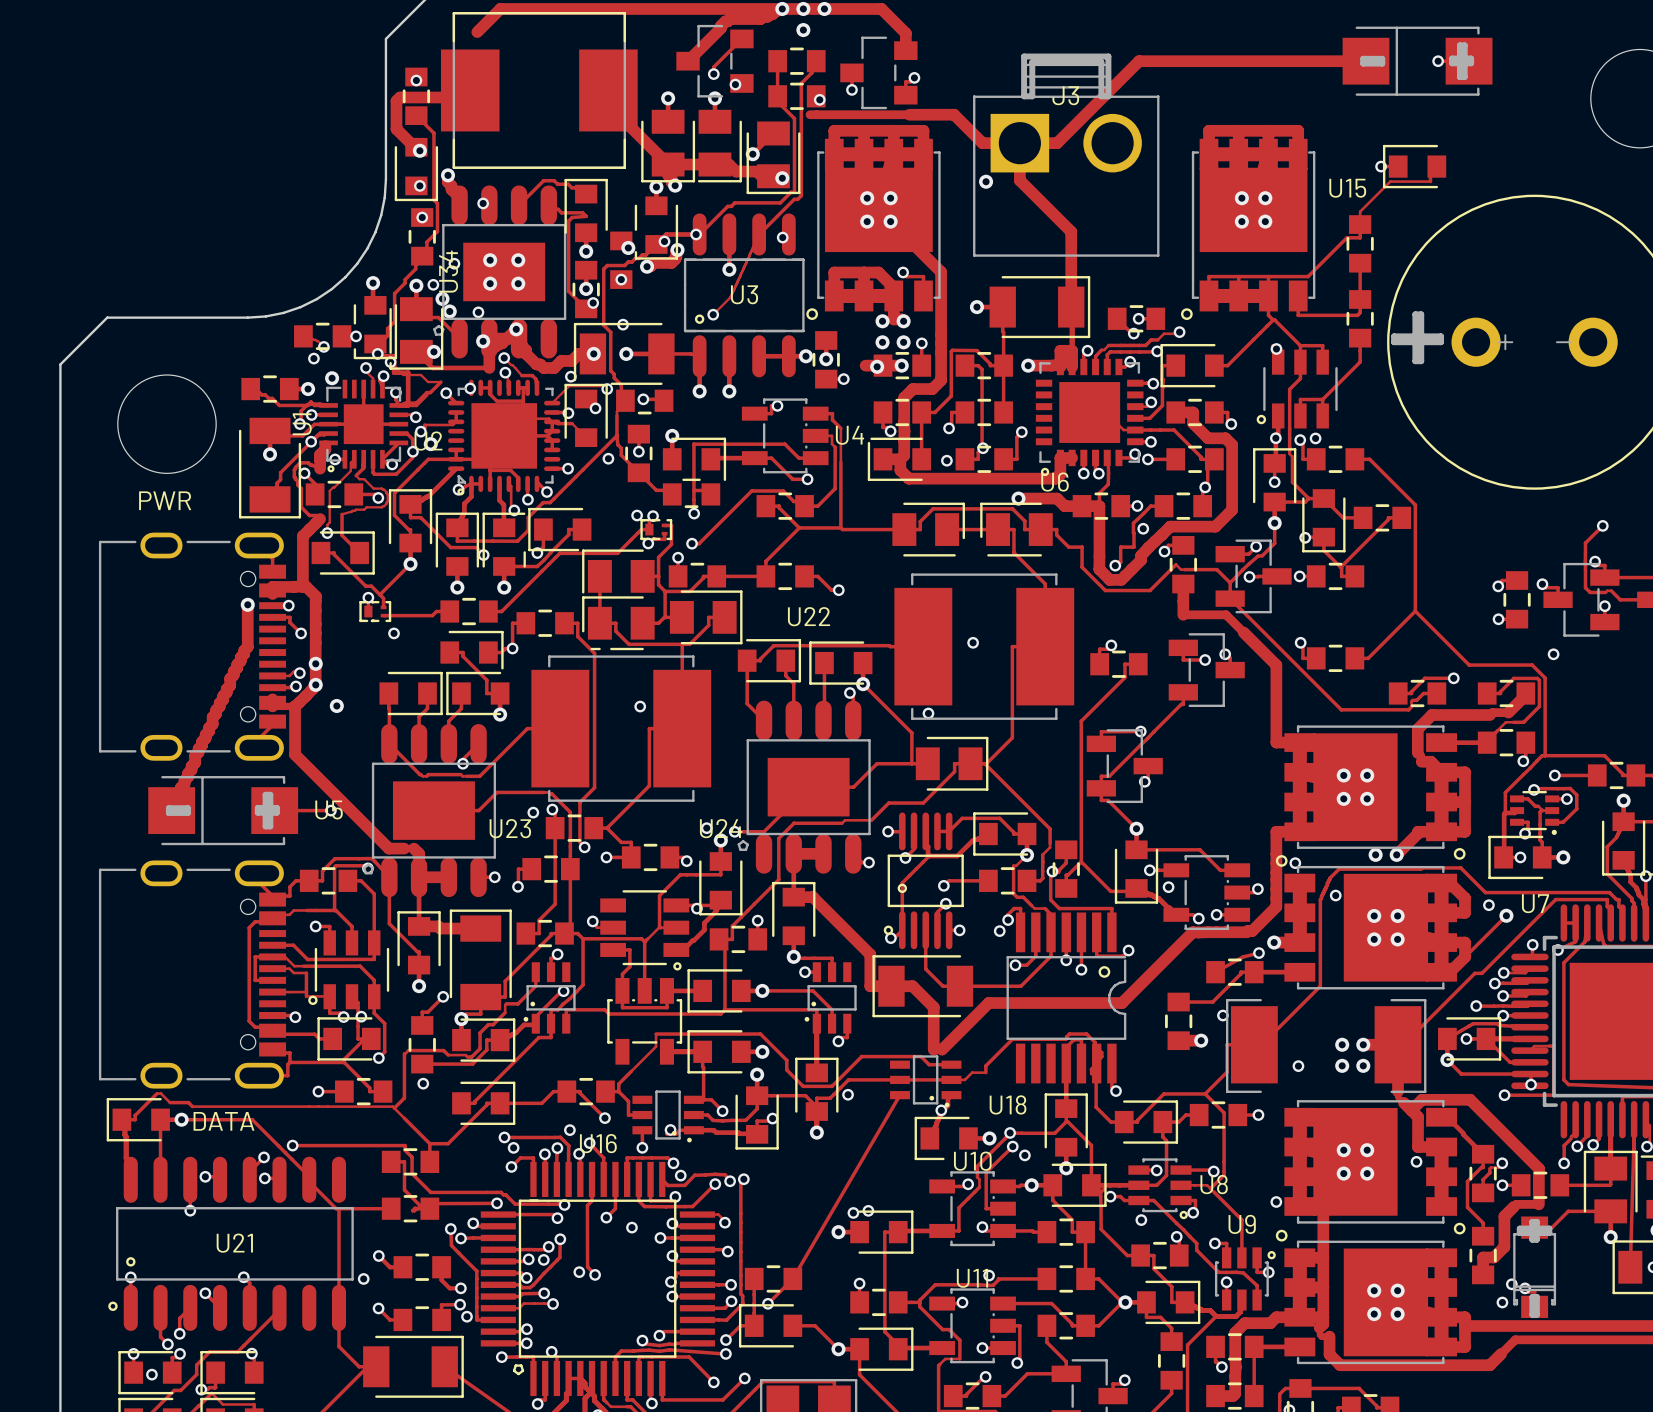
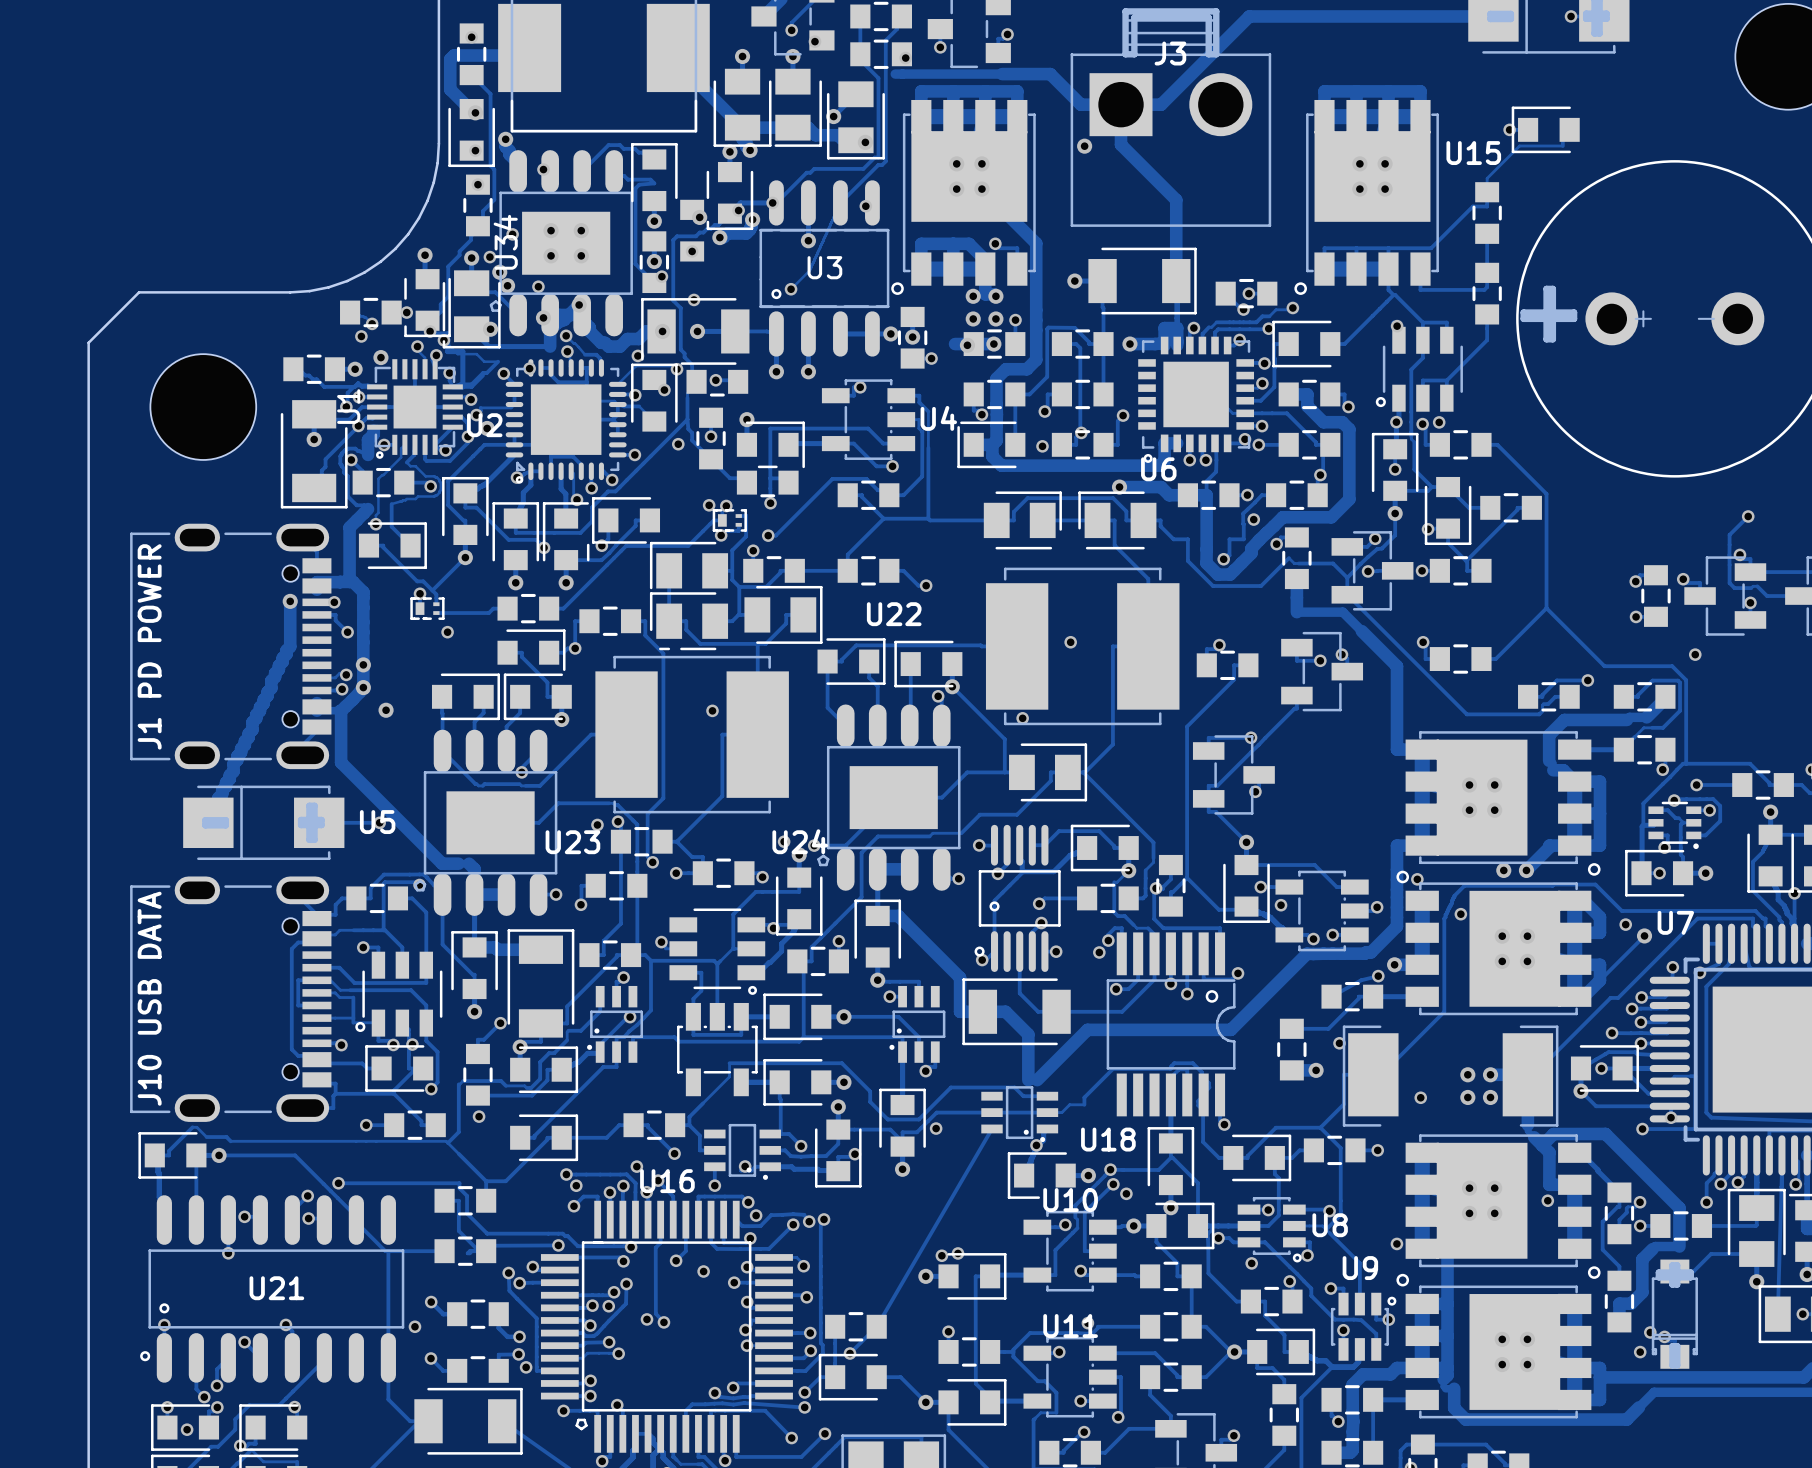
text: PWR (165, 500) -> none
text: none -> J1 PD POWER (149, 646)
text: none -> J10 USB DATA (149, 998)
text: DATA (223, 1121) -> none

